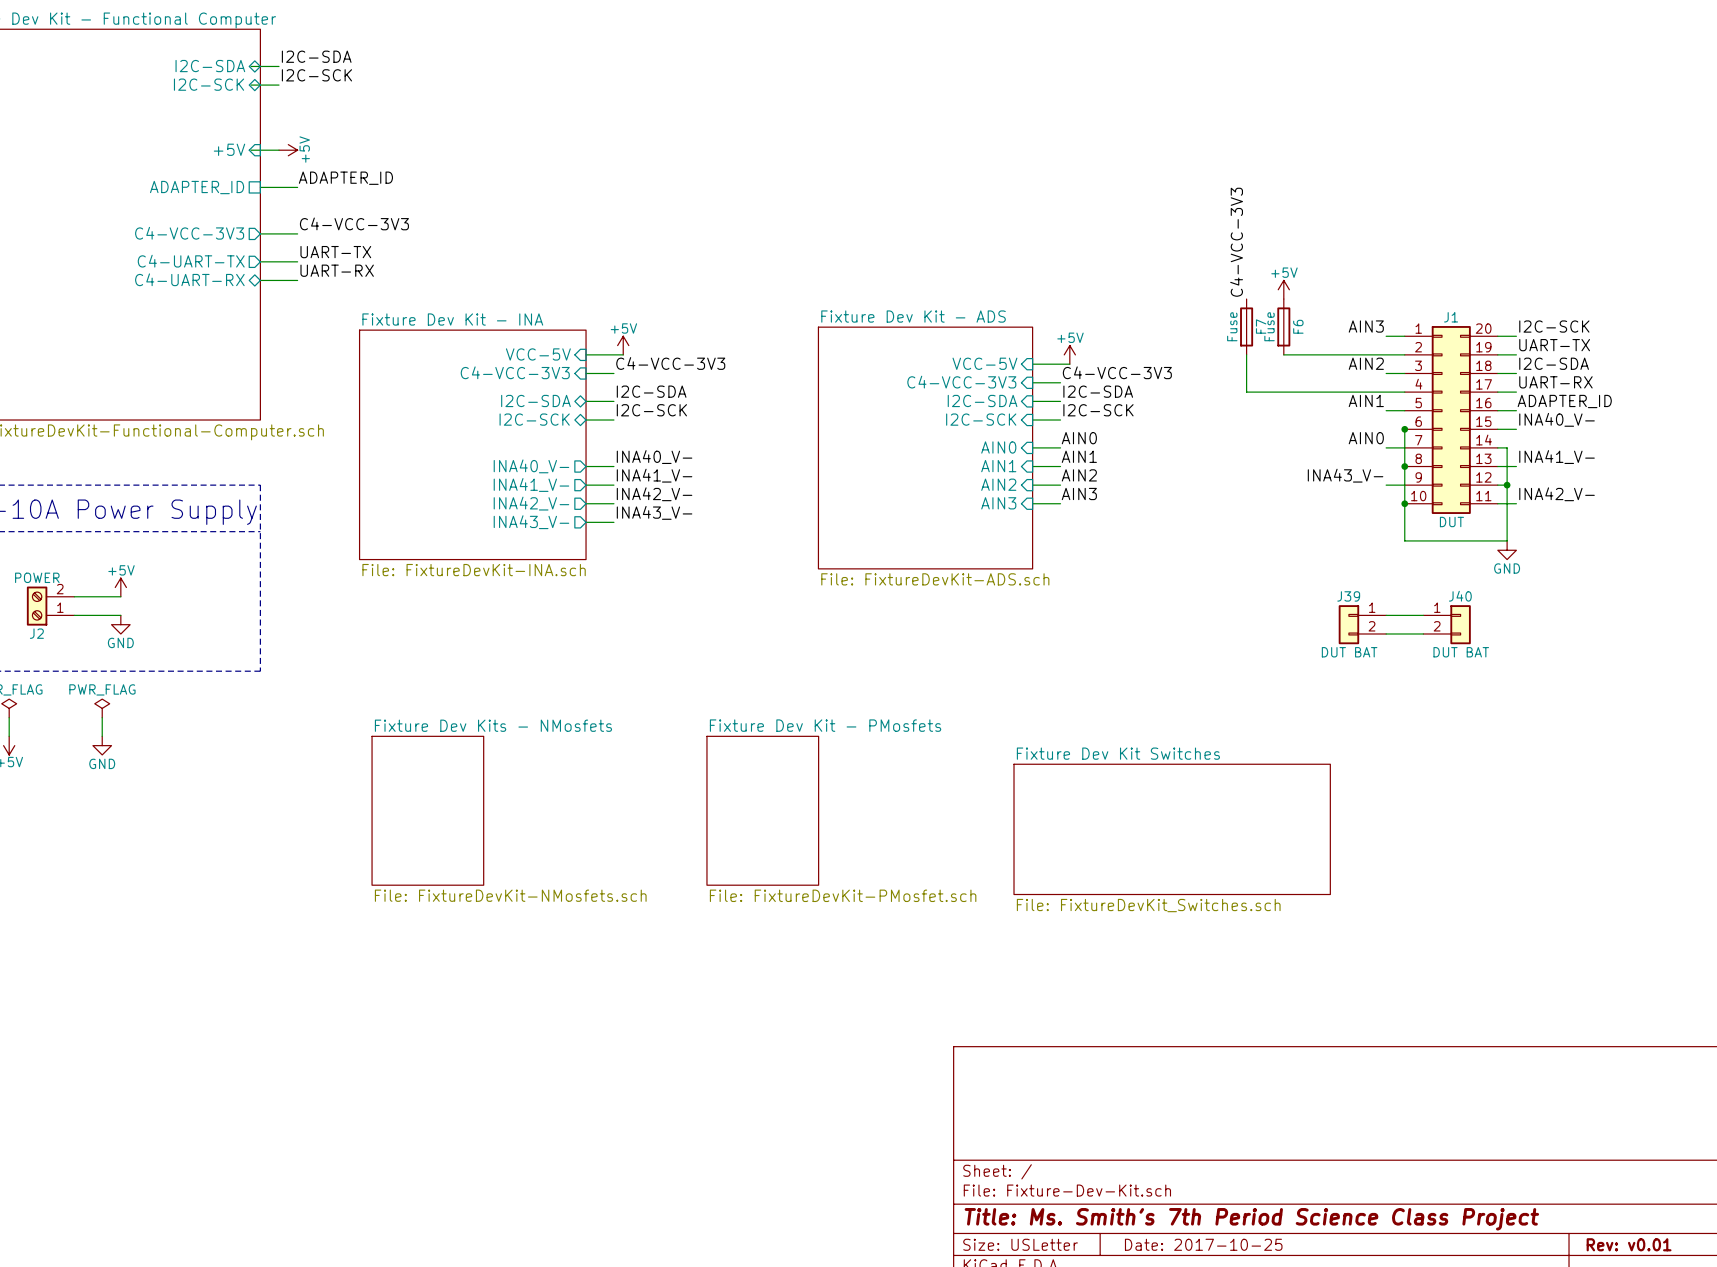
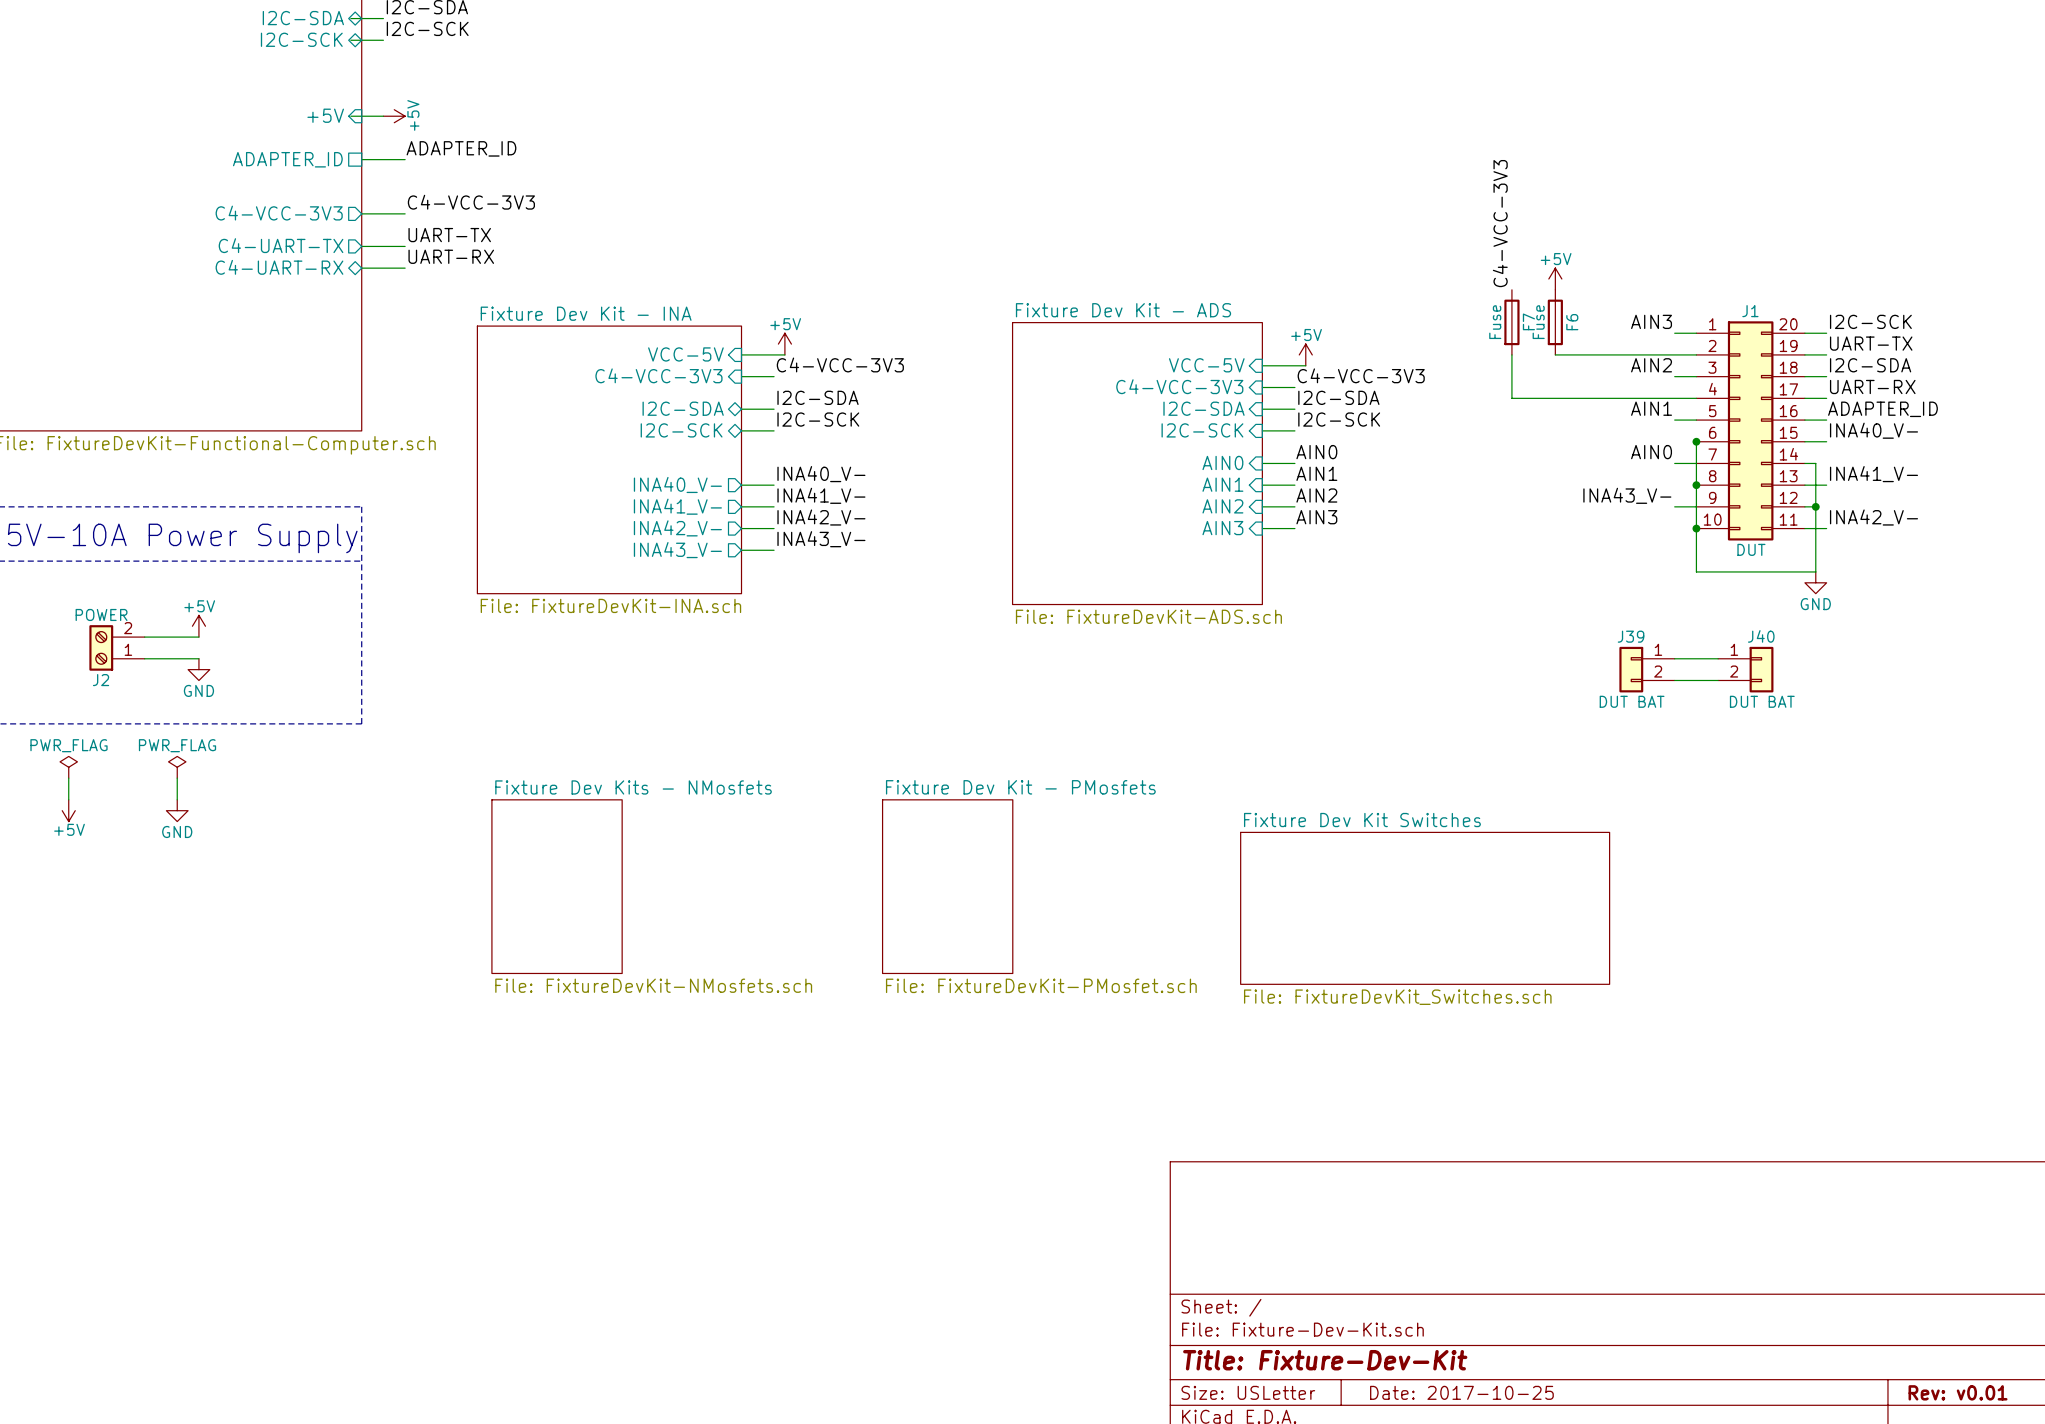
title block: Title: Ms. Smith's 7th Period Science Class Project (1251, 1219) -> Title: Fixture-Dev-Kit (1325, 1360)

